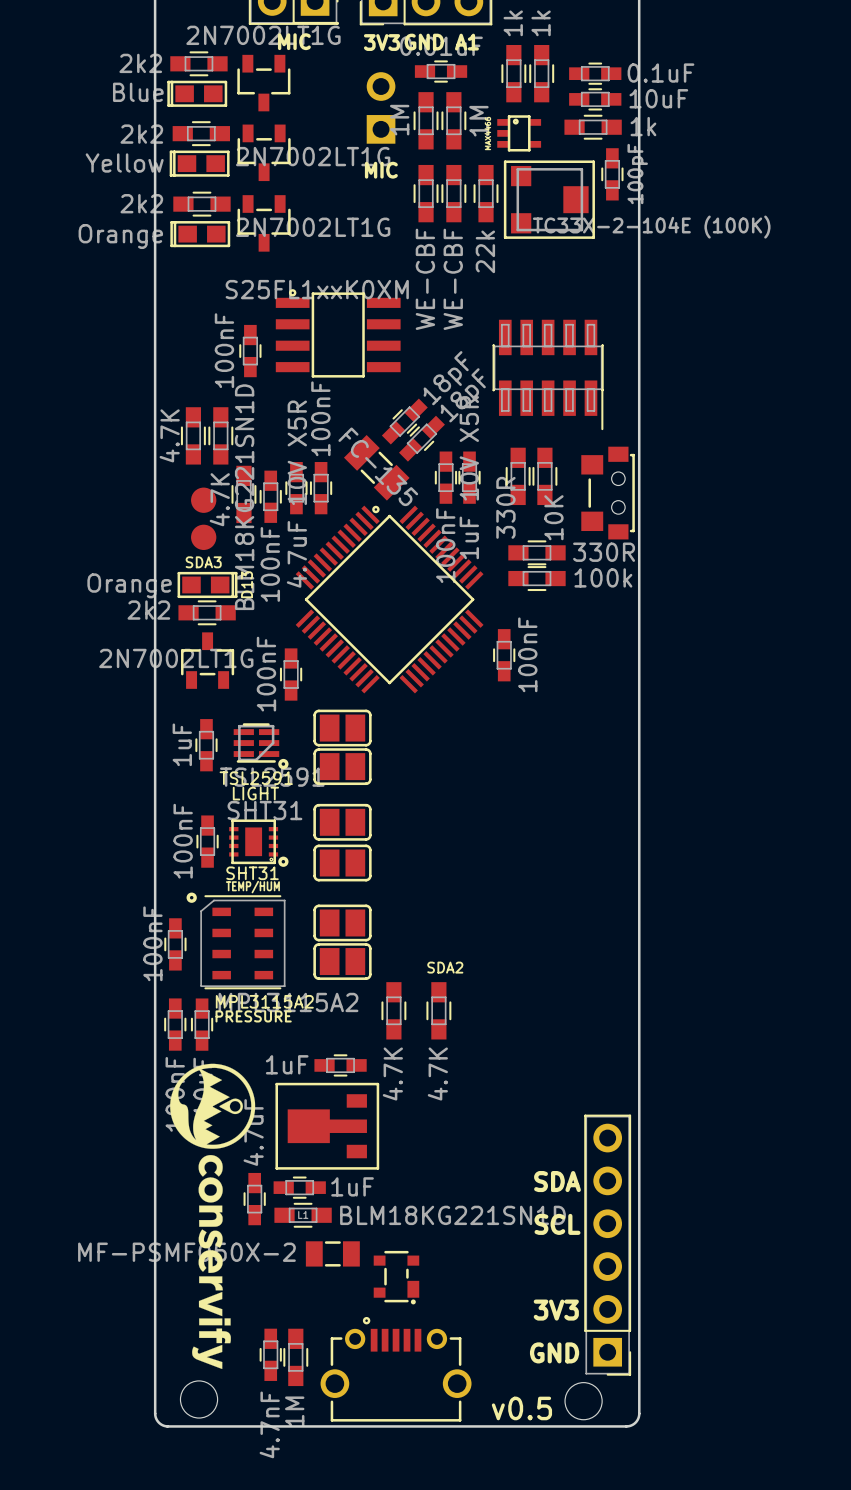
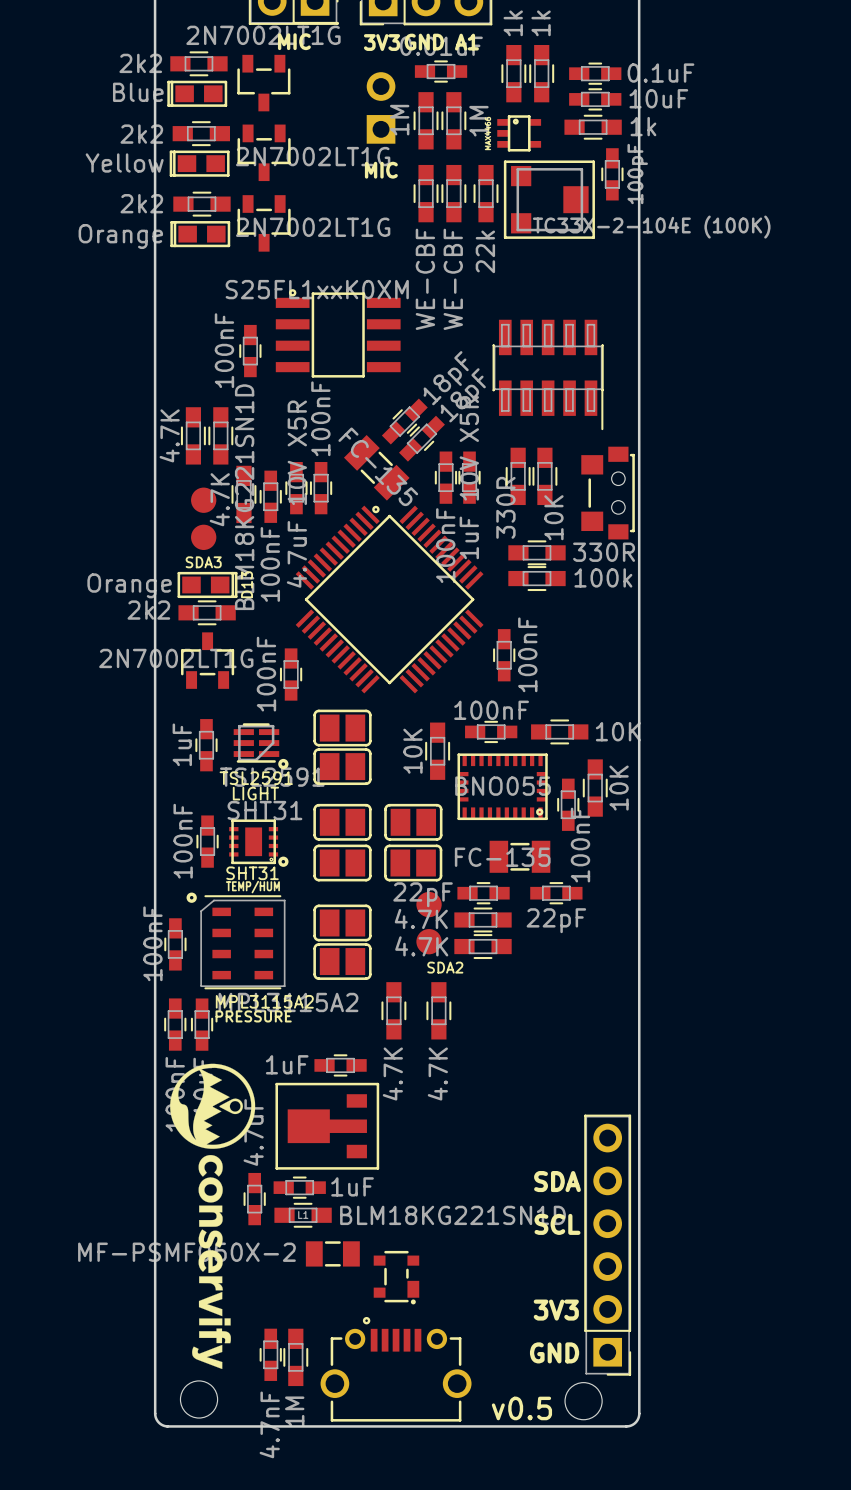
part: none -> 100nF (491, 731)
part: none -> 10K (559, 731)
part: none -> 10K (437, 751)
part: none -> BNO055 (502, 786)
part: none -> 10K (595, 788)
part: none -> 100nF (568, 804)
part: none -> (413, 822)
part: none -> FC-135 (519, 856)
part: none -> (413, 863)
part: none -> 22pF (483, 893)
part: none -> 22pF (556, 893)
part: none -> (429, 904)
part: none -> 4.7K (483, 919)
part: none -> (429, 941)
part: none -> 4.7K (483, 946)

